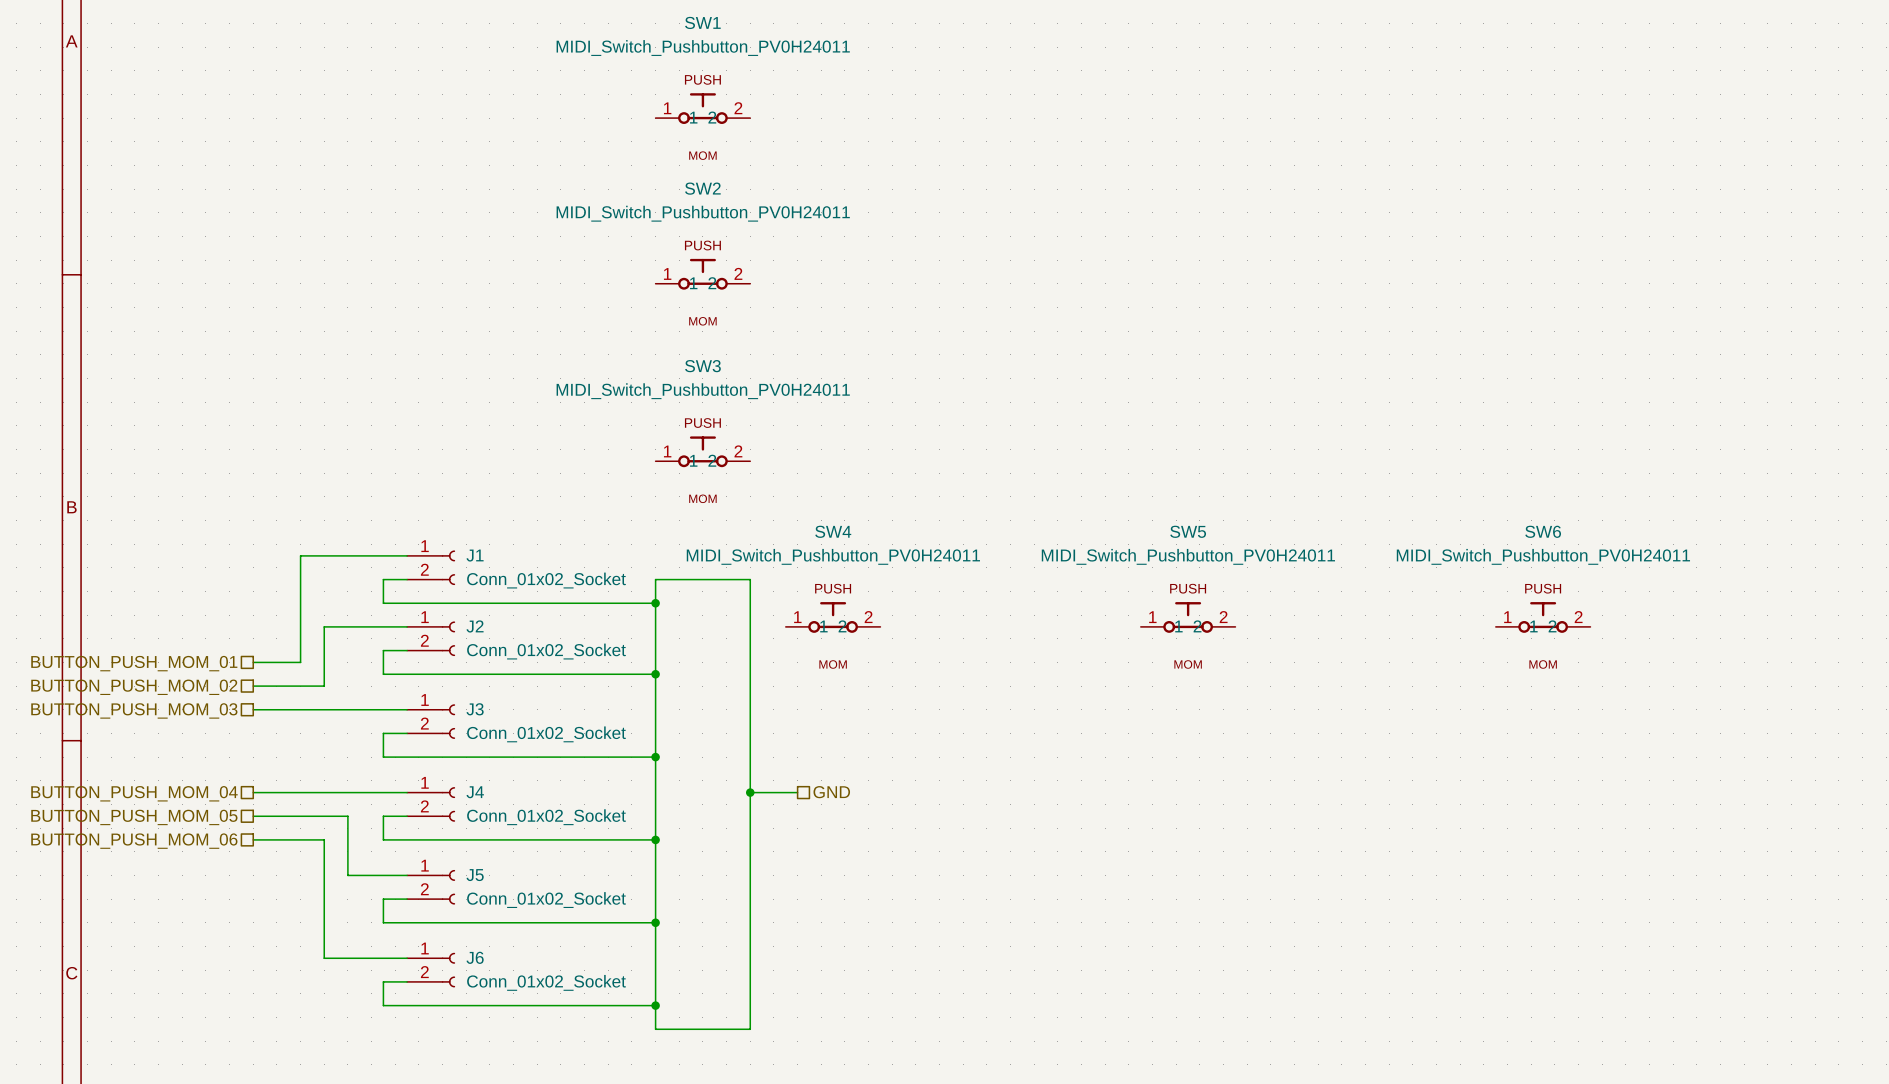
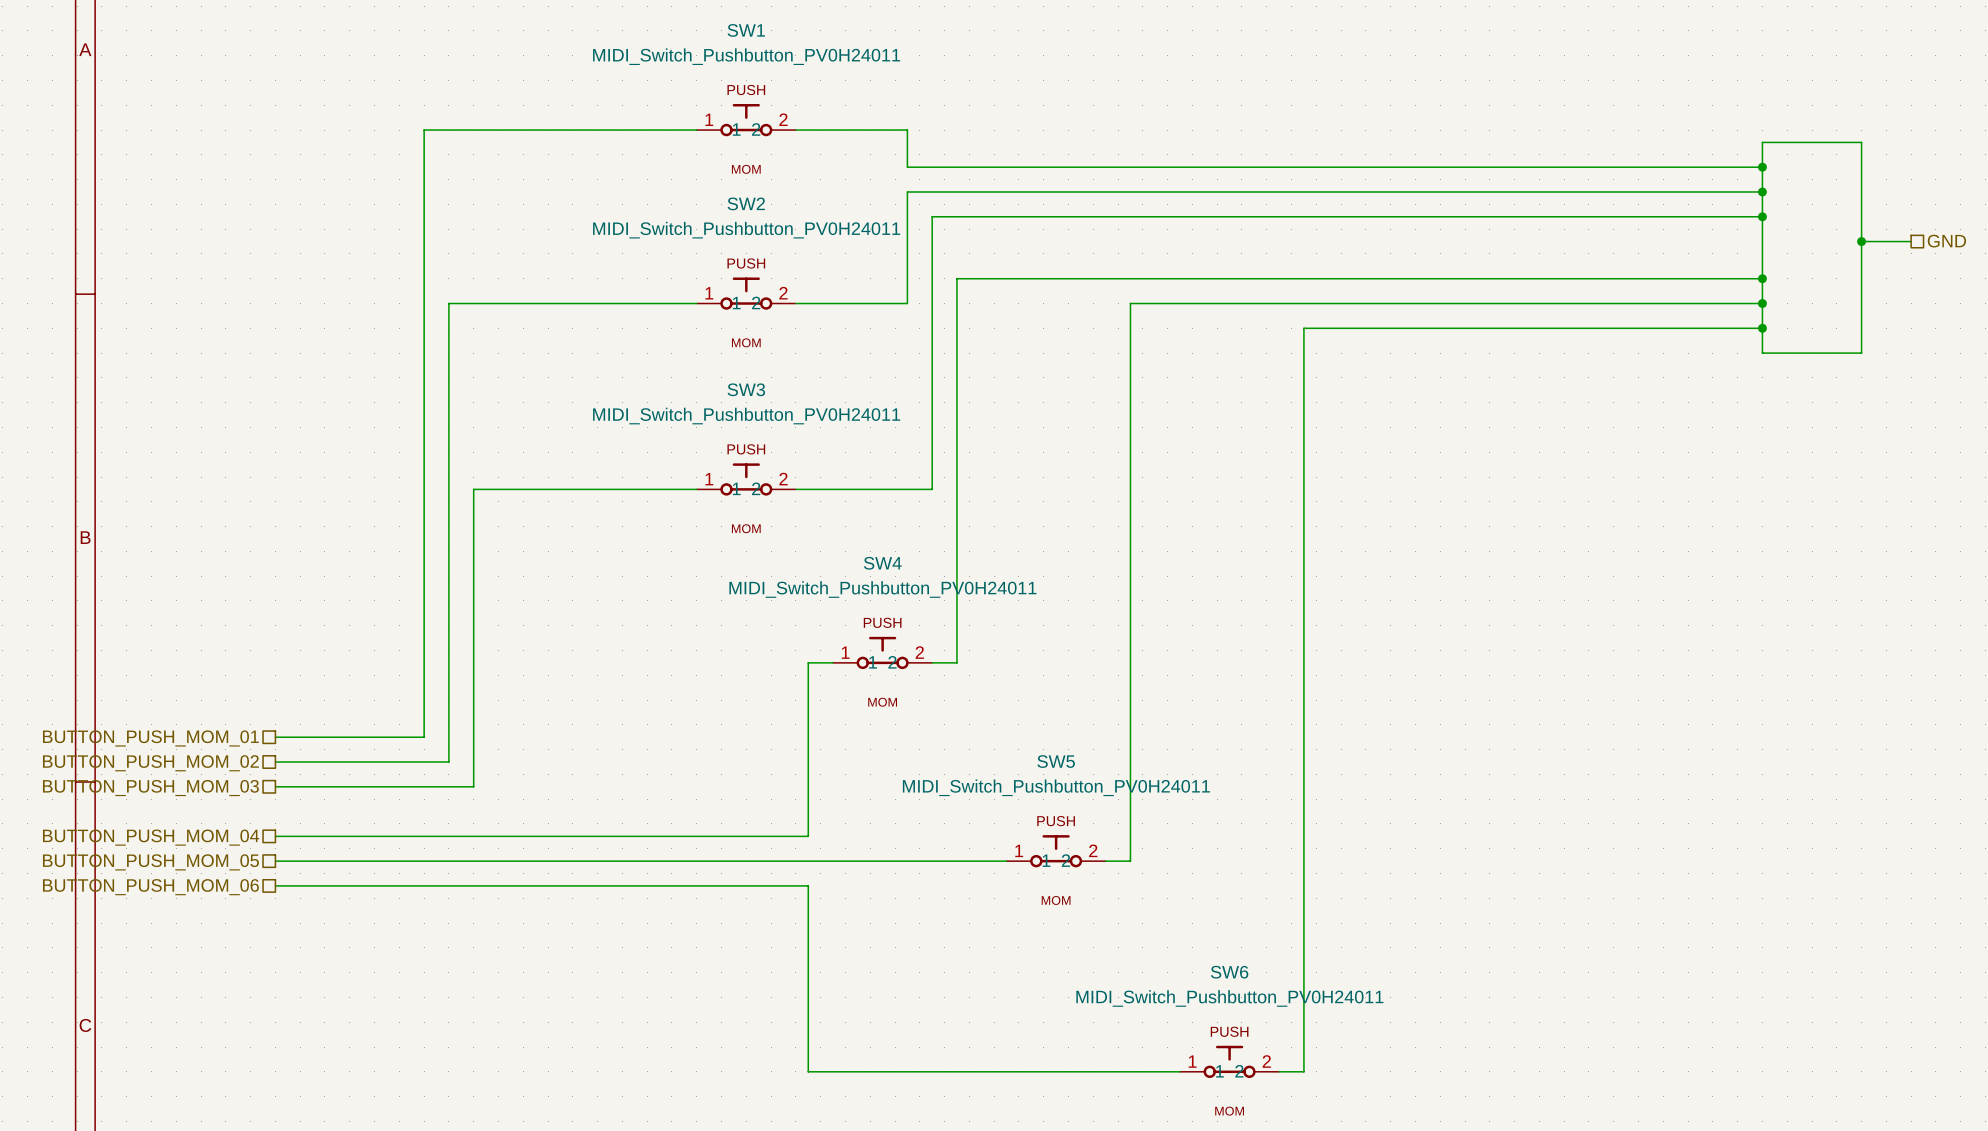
wire: none -> (696, 130) (424, 130) (424, 737) (275, 737)
wire: none -> (795, 130) (907, 130) (907, 167) (1762, 167)
wire: none -> (1762, 142) (1861, 142) (1861, 353) (1762, 353) (1762, 142)
junction: none -> (1762, 167)
wire: none -> (1762, 191) (907, 191) (907, 303) (795, 303)
junction: none -> (1762, 191)
wire: none -> (1762, 216) (932, 216) (932, 489) (795, 489)
junction: none -> (1762, 216)
wire: none -> (1861, 241) (1911, 241)
junction: none -> (1861, 241)
hierarchical label: none -> GND (1946, 241)
wire: none -> (1762, 278) (956, 278) (956, 662) (932, 662)
junction: none -> (1762, 278)
wire: none -> (696, 303) (448, 303) (448, 762) (275, 762)
wire: none -> (1762, 303) (1130, 303) (1130, 861) (1105, 861)
junction: none -> (1762, 303)
wire: none -> (1762, 328) (1303, 328) (1303, 1071) (1279, 1071)
junction: none -> (1762, 328)
wire: none -> (696, 489) (473, 489) (473, 786) (275, 786)
wire: (407, 555) (300, 555) (300, 662) (253, 662) -> none
J1: Conn_01x02_Socket (431, 567) -> none
wire: (407, 579) (383, 579) (383, 603) (655, 603) -> none
wire: (655, 579) (655, 1029) (750, 1029) (750, 579) (655, 579) -> none
junction: (655, 603) -> none
SW5 position: (1188, 617) -> (1056, 851)
SW6 position: (1543, 617) -> (1229, 1061)
wire: (407, 626) (324, 626) (324, 686) (253, 686) -> none
J2: Conn_01x02_Socket (431, 638) -> none
wire: (407, 650) (383, 650) (383, 674) (655, 674) -> none
hierarchical label position: BUTTON_PUSH_MOM_01 (134, 663) -> BUTTON_PUSH_MOM_01 (150, 738)
junction: (655, 674) -> none
hierarchical label position: BUTTON_PUSH_MOM_02 (134, 687) -> BUTTON_PUSH_MOM_02 (150, 763)
wire: (253, 709) (407, 709) -> none
hierarchical label position: BUTTON_PUSH_MOM_03 (134, 710) -> BUTTON_PUSH_MOM_03 (150, 788)
J3: Conn_01x02_Socket (431, 721) -> none
wire: (407, 733) (383, 733) (383, 757) (655, 757) -> none
junction: (655, 757) -> none
wire: none -> (436, 836) (795, 836)
junction: (750, 792) -> none
wire: (762, 792) (797, 792) -> (808, 836) (808, 662) (833, 662)
hierarchical label: GND (831, 792) -> none
J4: Conn_01x02_Socket (431, 804) -> none
wire: (347, 816) (347, 875) (407, 875) -> none
wire: (383, 816) (383, 839) -> (411, 861) (374, 861)
wire: none -> (436, 861) (1006, 861)
wire: (324, 839) (324, 958) (407, 958) -> (349, 885) (411, 885)
wire: none -> (696, 885) (808, 885) (808, 1071) (1180, 1071)
junction: (655, 839) -> none
J5: Conn_01x02_Socket (431, 887) -> none
wire: (407, 899) (383, 899) (383, 922) (655, 922) -> none
junction: (655, 922) -> none
J6: Conn_01x02_Socket (431, 970) -> none
wire: (407, 981) (383, 981) (383, 1005) (655, 1005) -> none
junction: (655, 1005) -> none

